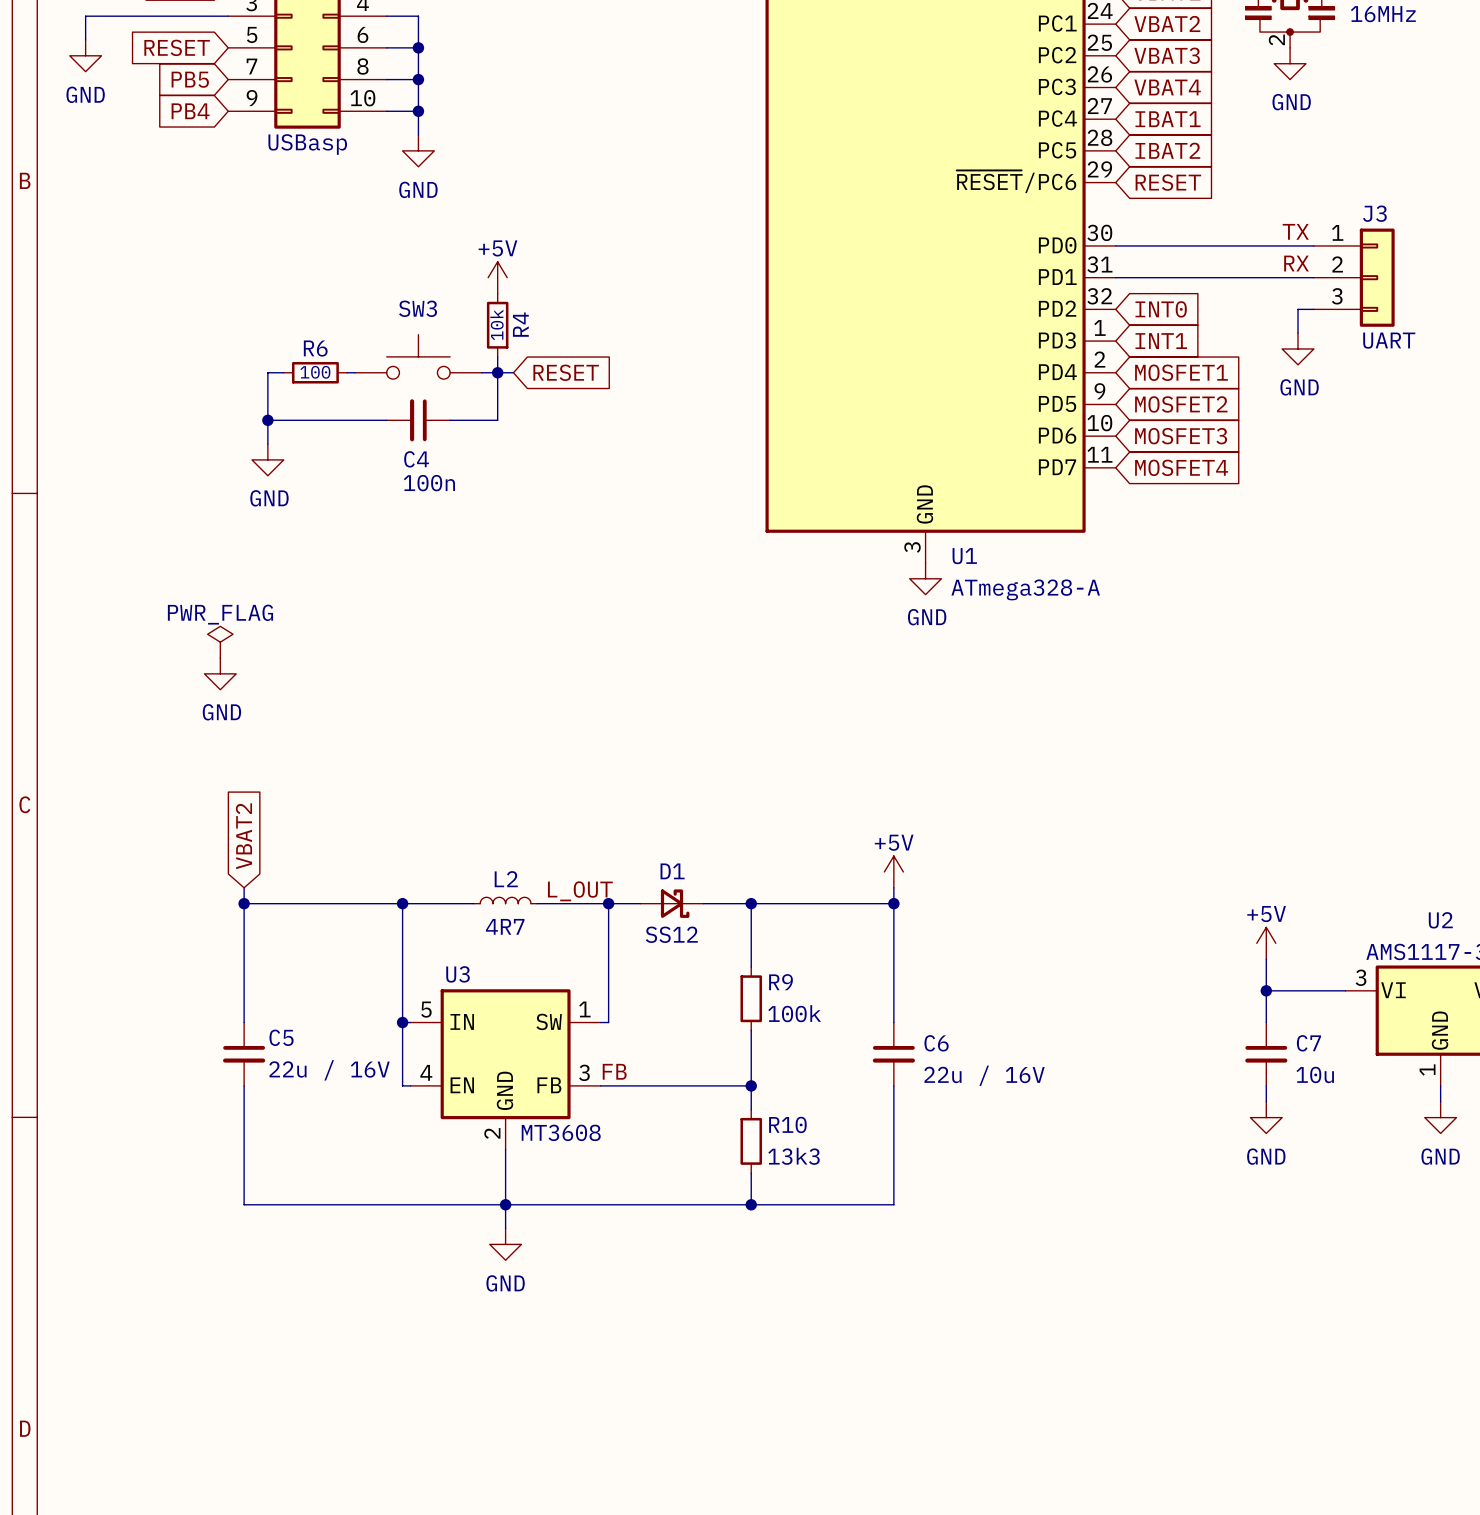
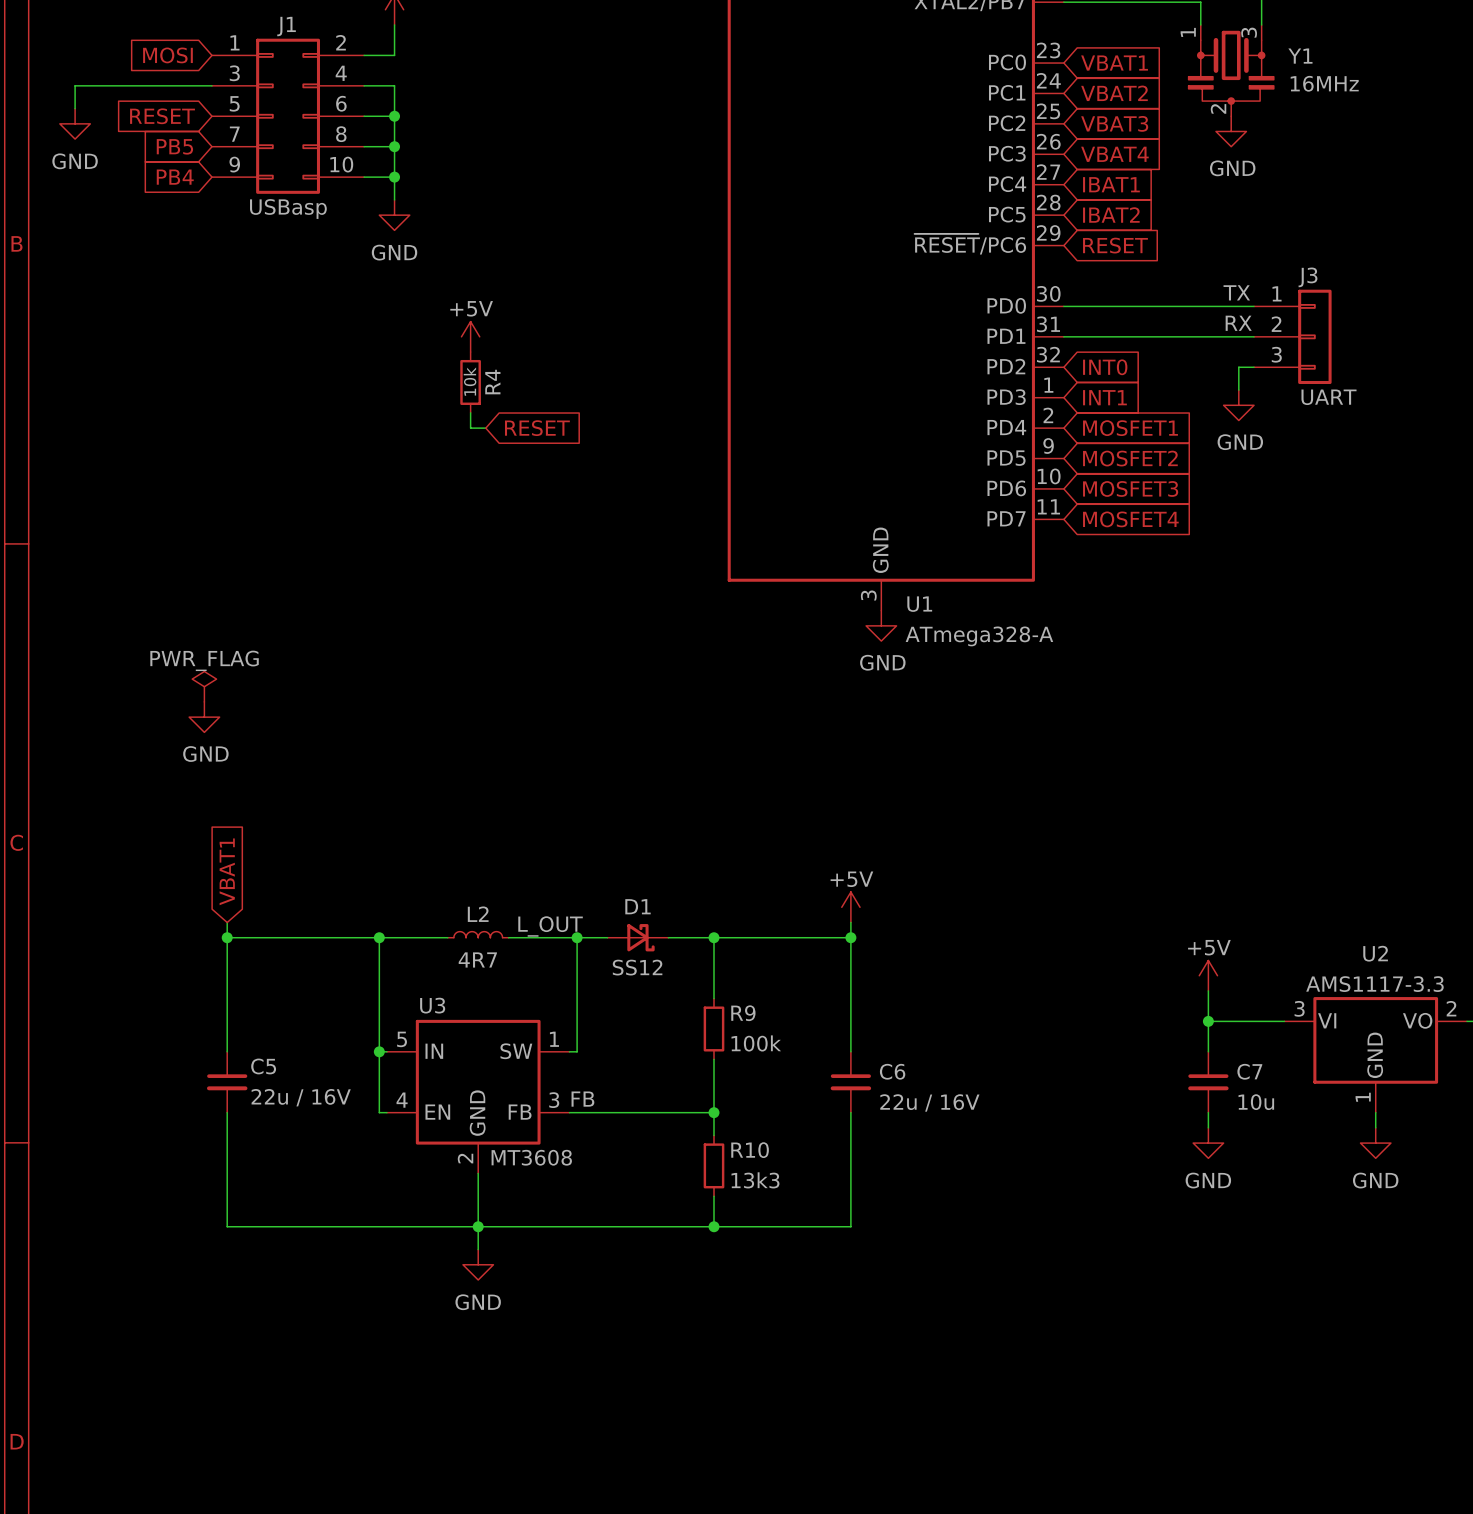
SW3: (418, 356) -> none
wire: (283, 372) (267, 372) (267, 444) -> none
R6: 100 (315, 372) -> none
wire: (347, 372) (355, 372) -> none
wire: (481, 372) (497, 372) (497, 420) (450, 420) -> none
junction: (497, 372) -> none
wire: (267, 420) (386, 420) -> none
junction: (267, 420) -> none
C4: 100n (418, 420) -> none
power symbol: GND (267, 459) -> none
global label: VBAT2 (243, 836) -> VBAT1 (227, 871)

